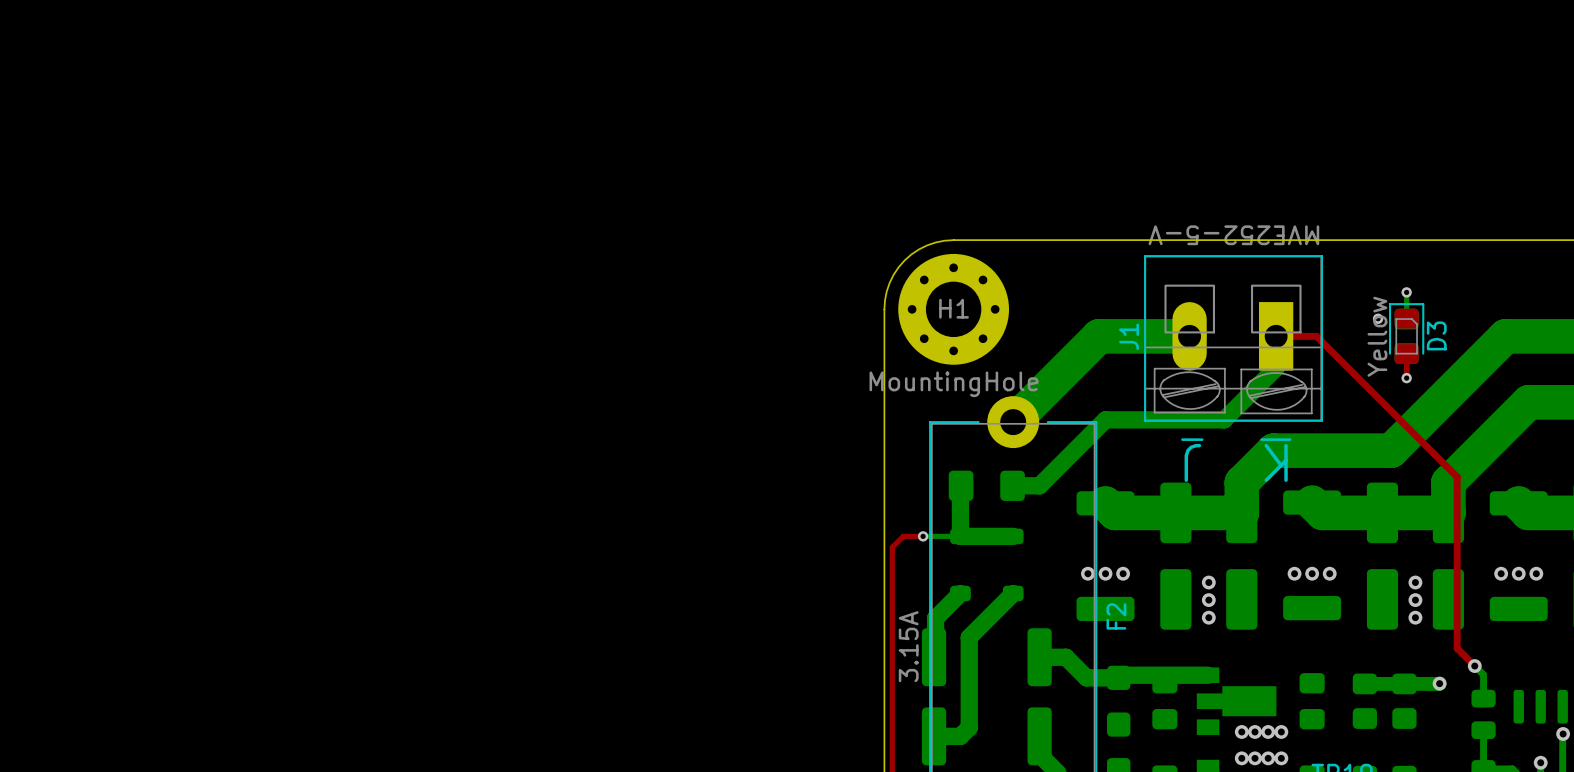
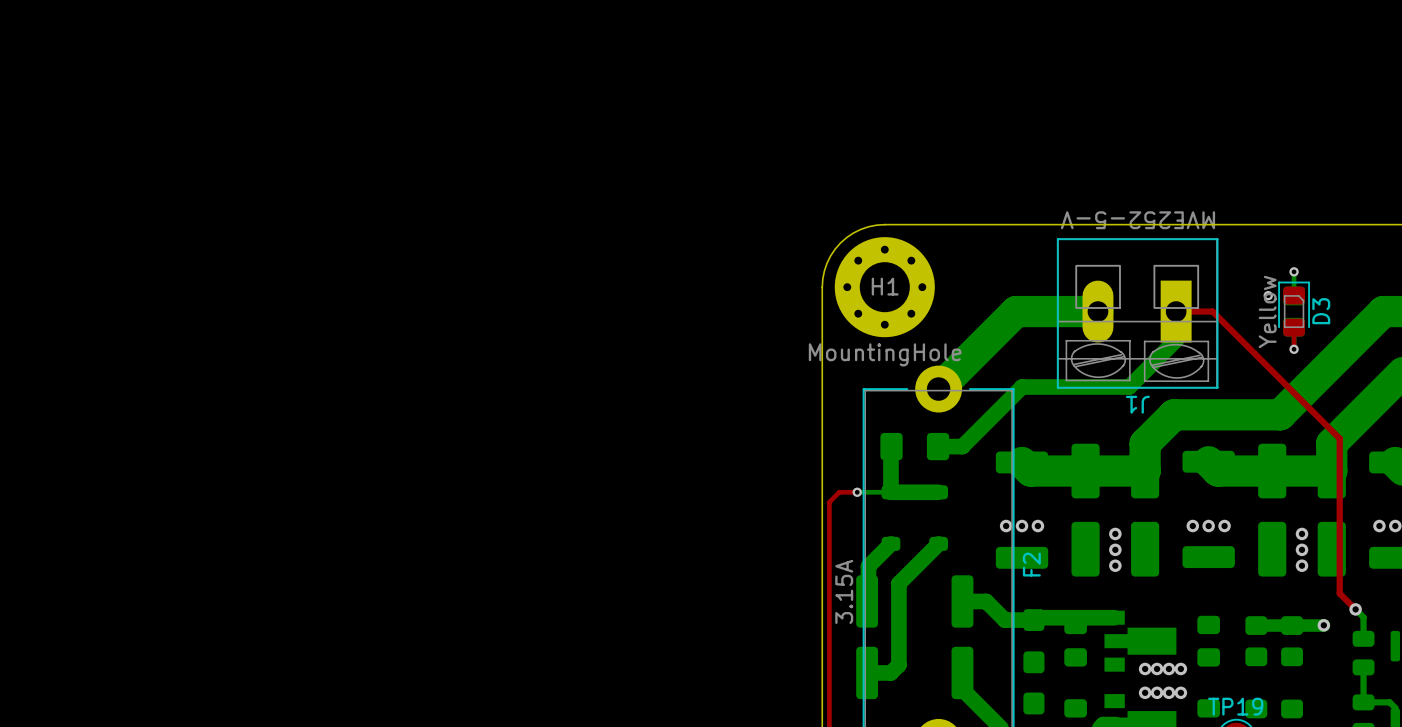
J1 name rotation: 0° (1129, 336) -> 90° counterclockwise (1137, 404)
J1 name position: J1 (1129, 336) -> J1 (1137, 404)
line: (1182, 439) (1202, 439) -> none
line: (1261, 439) (1290, 439) -> none
text: J (1192, 462) -> none
text: K (1276, 462) -> none

